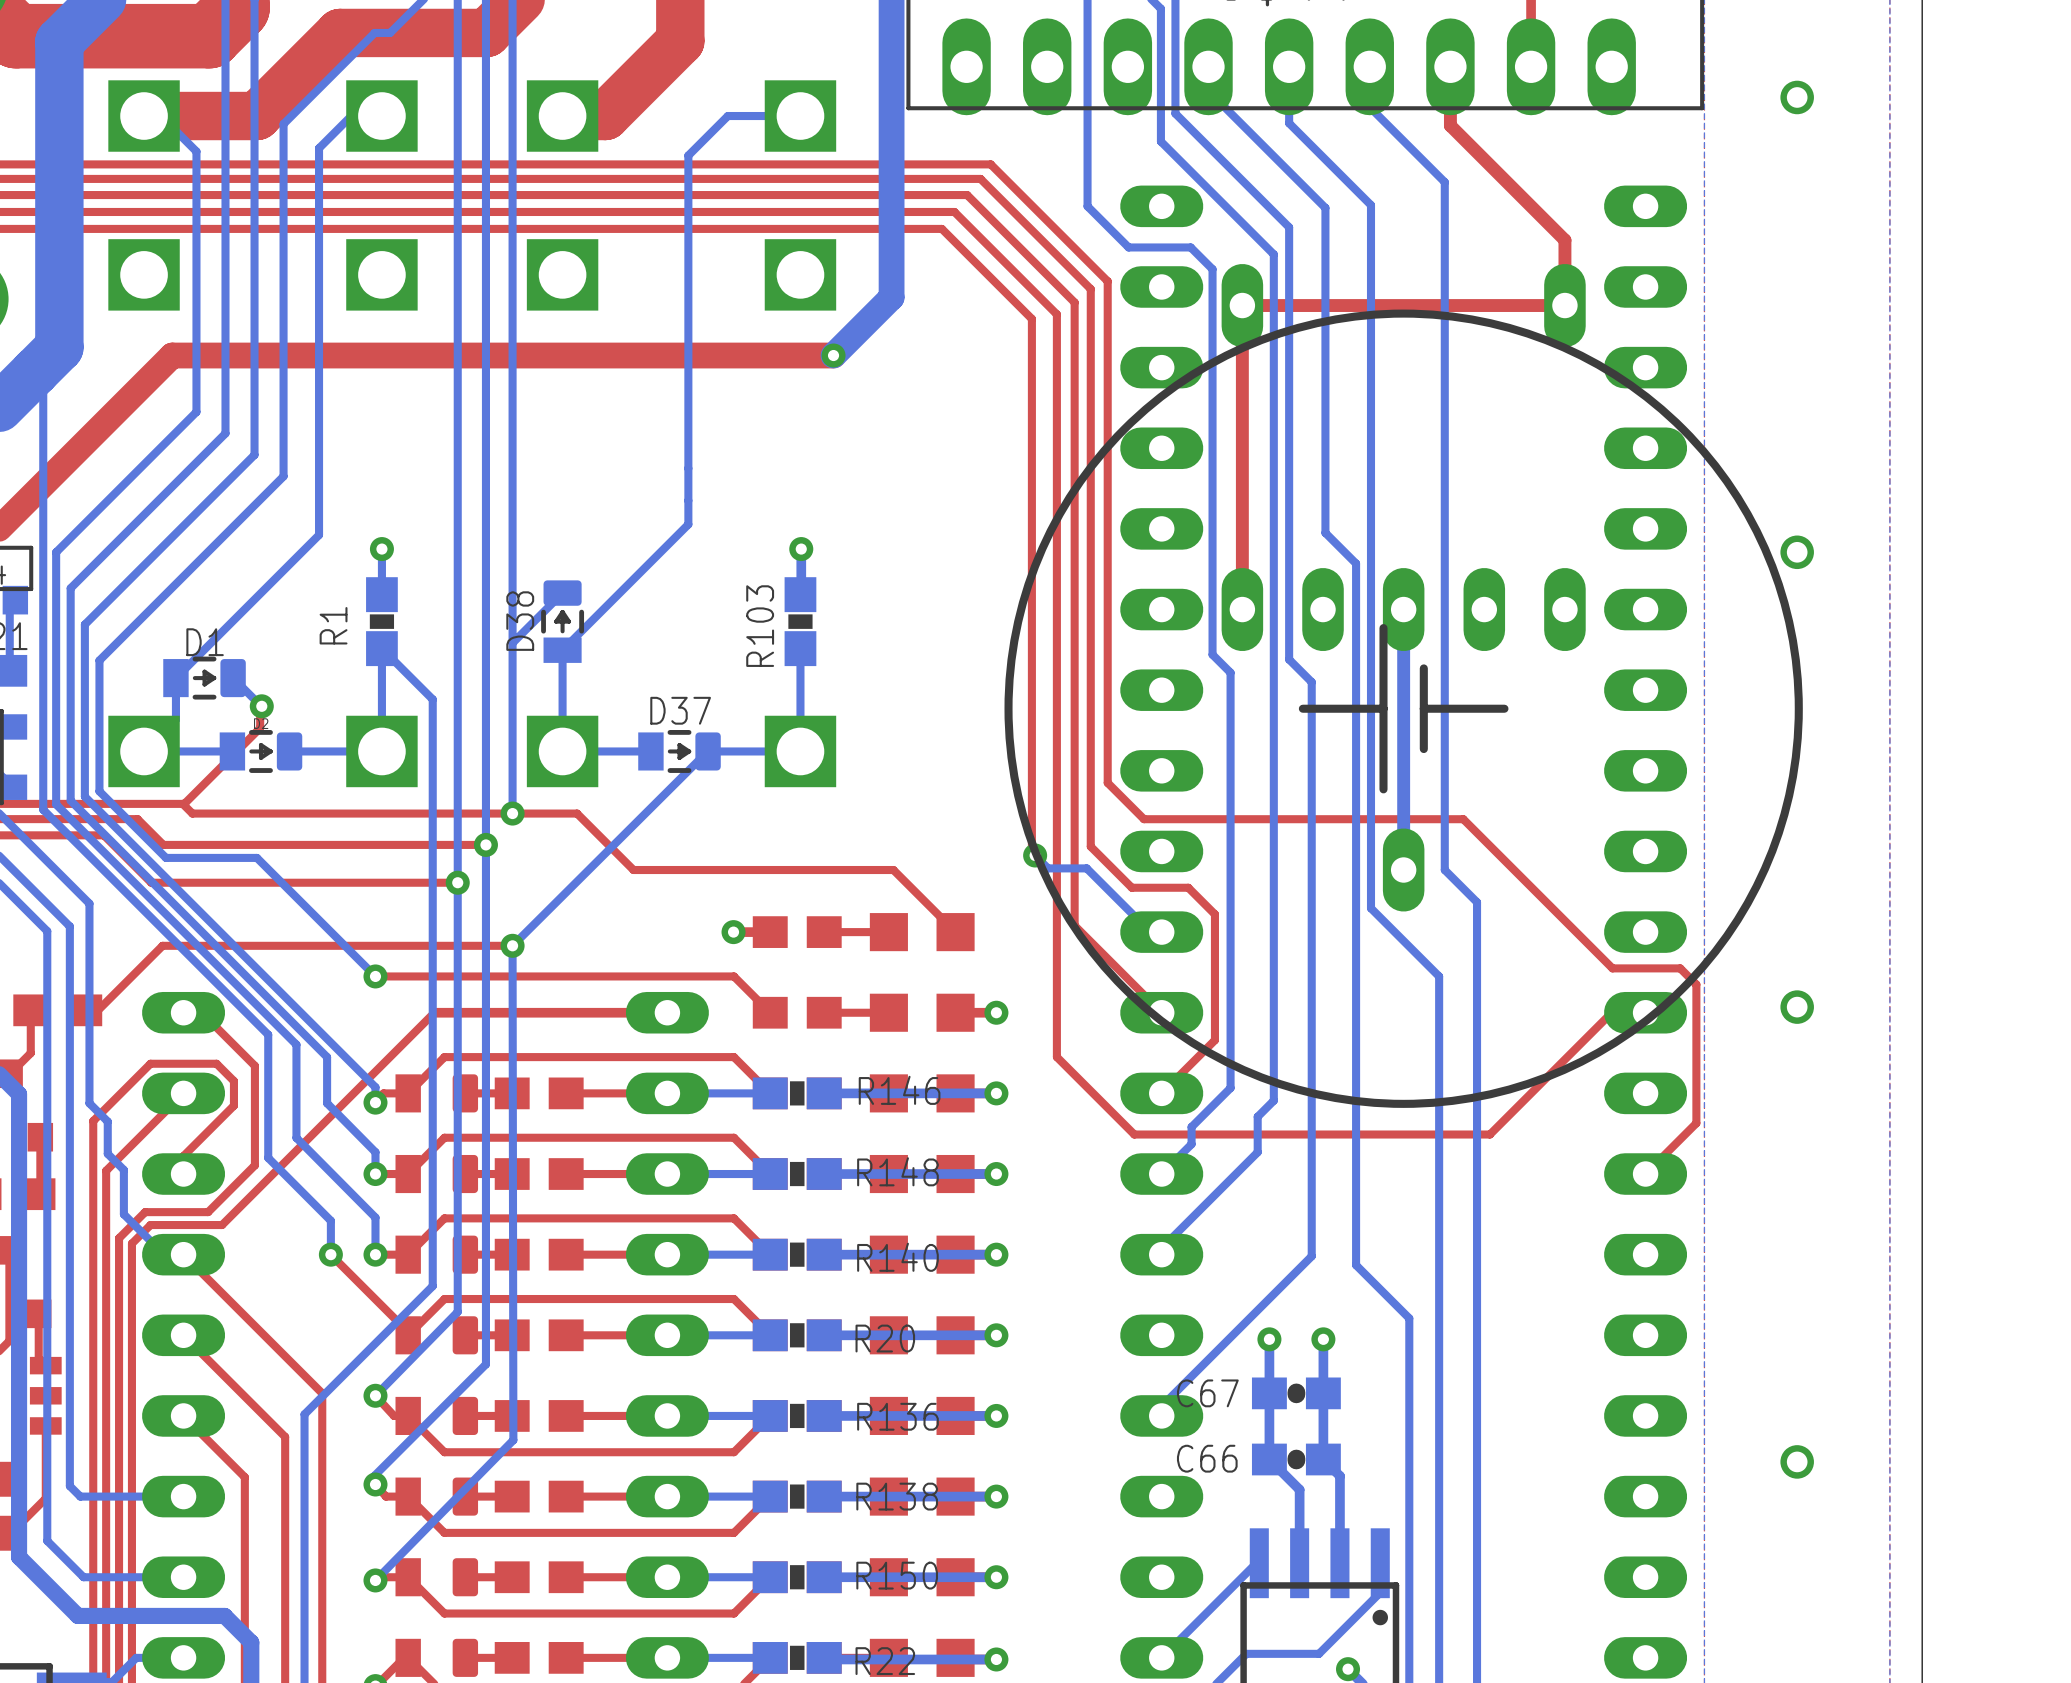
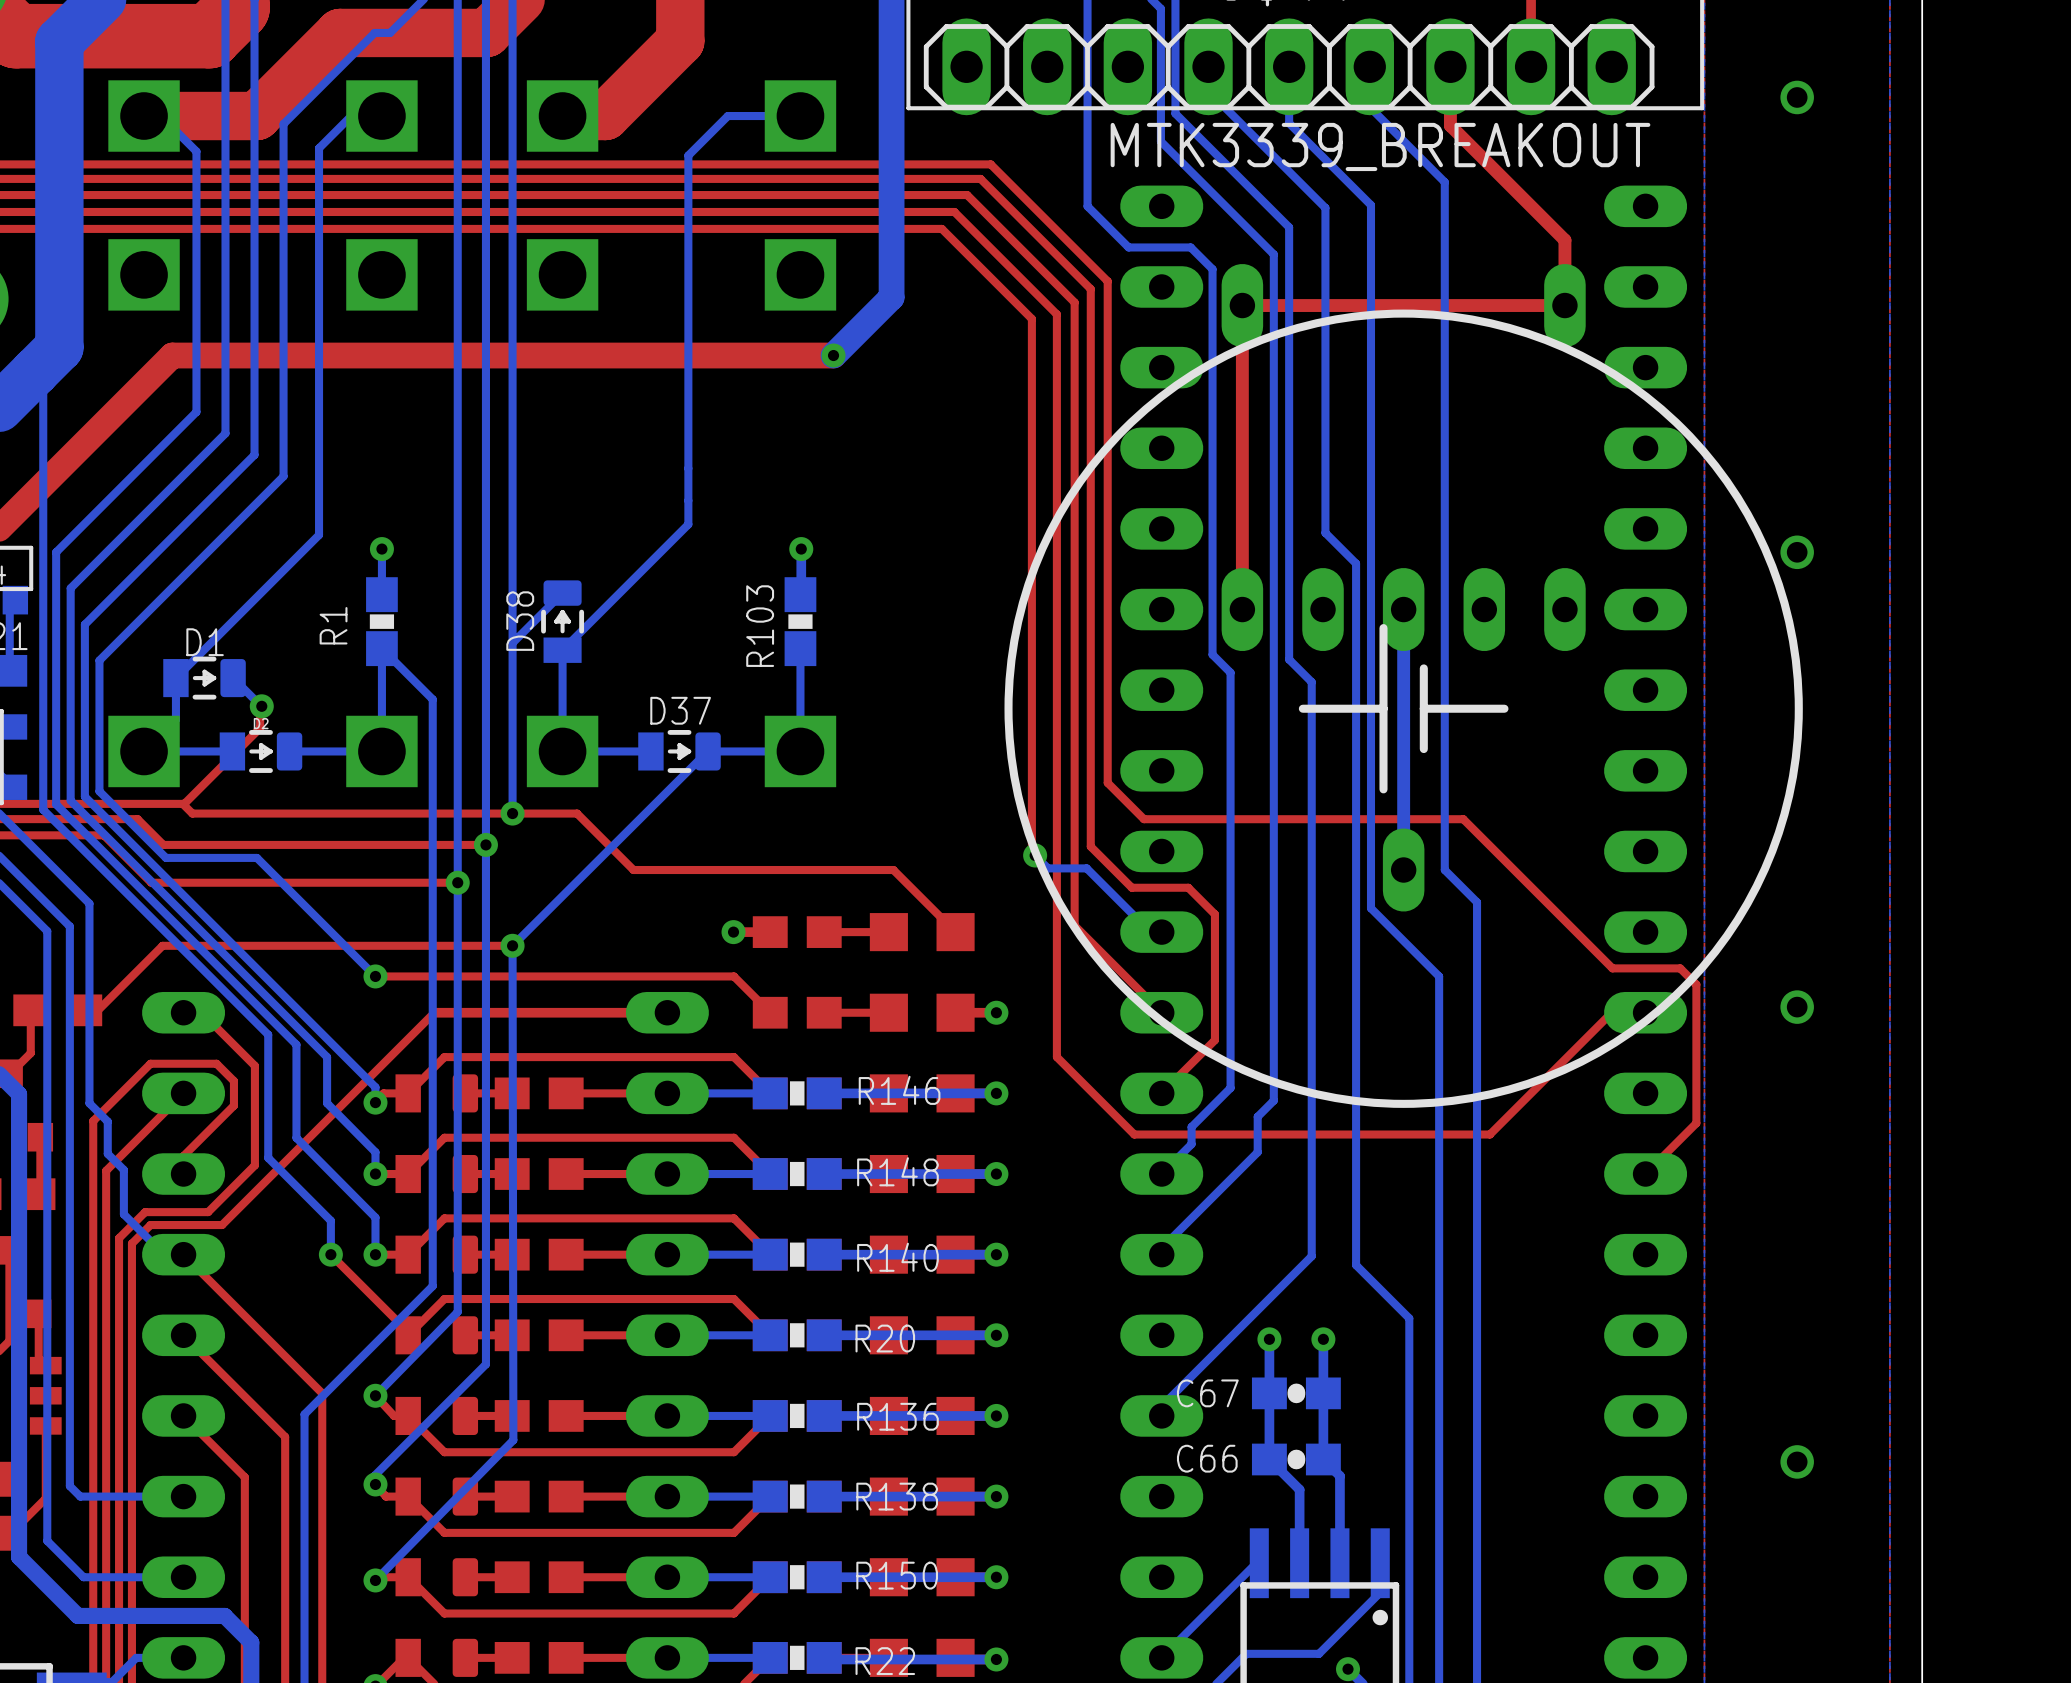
MTK3339_BREAKOUT side: top (1289, 66) -> bottom (1289, 66)

